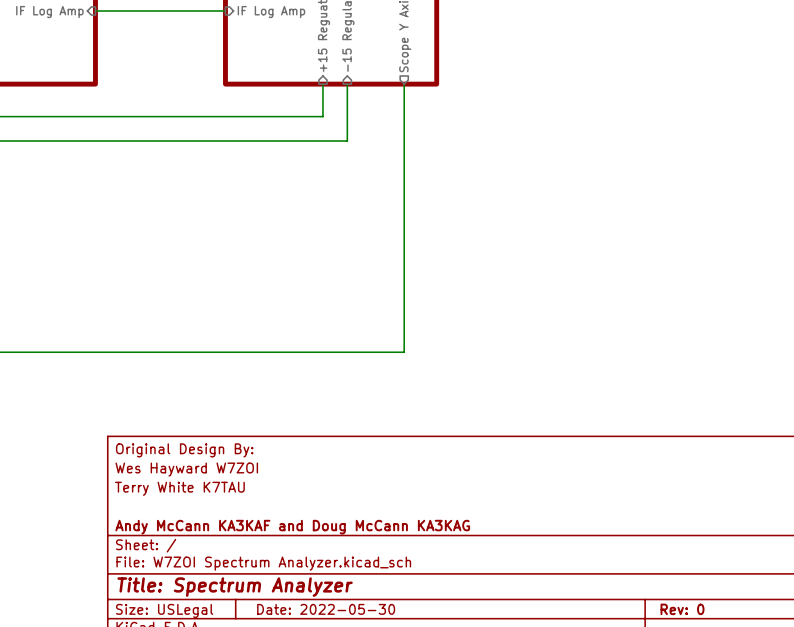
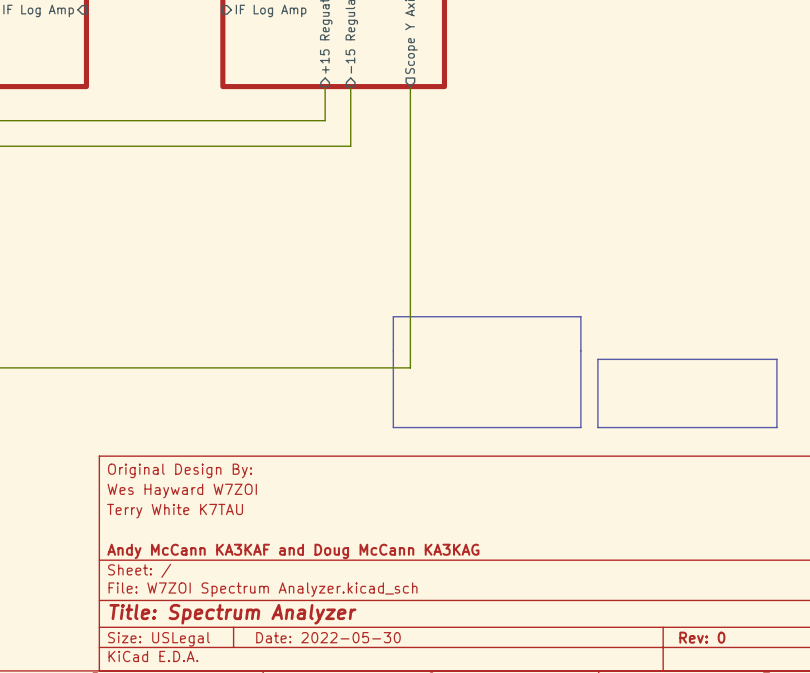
wire: (95, 11) (225, 11) -> none
line: none -> (393, 316) (393, 427) (580, 427) (580, 316) (393, 316)
line: none -> (597, 359) (776, 359) (776, 427) (597, 427) (597, 359)

